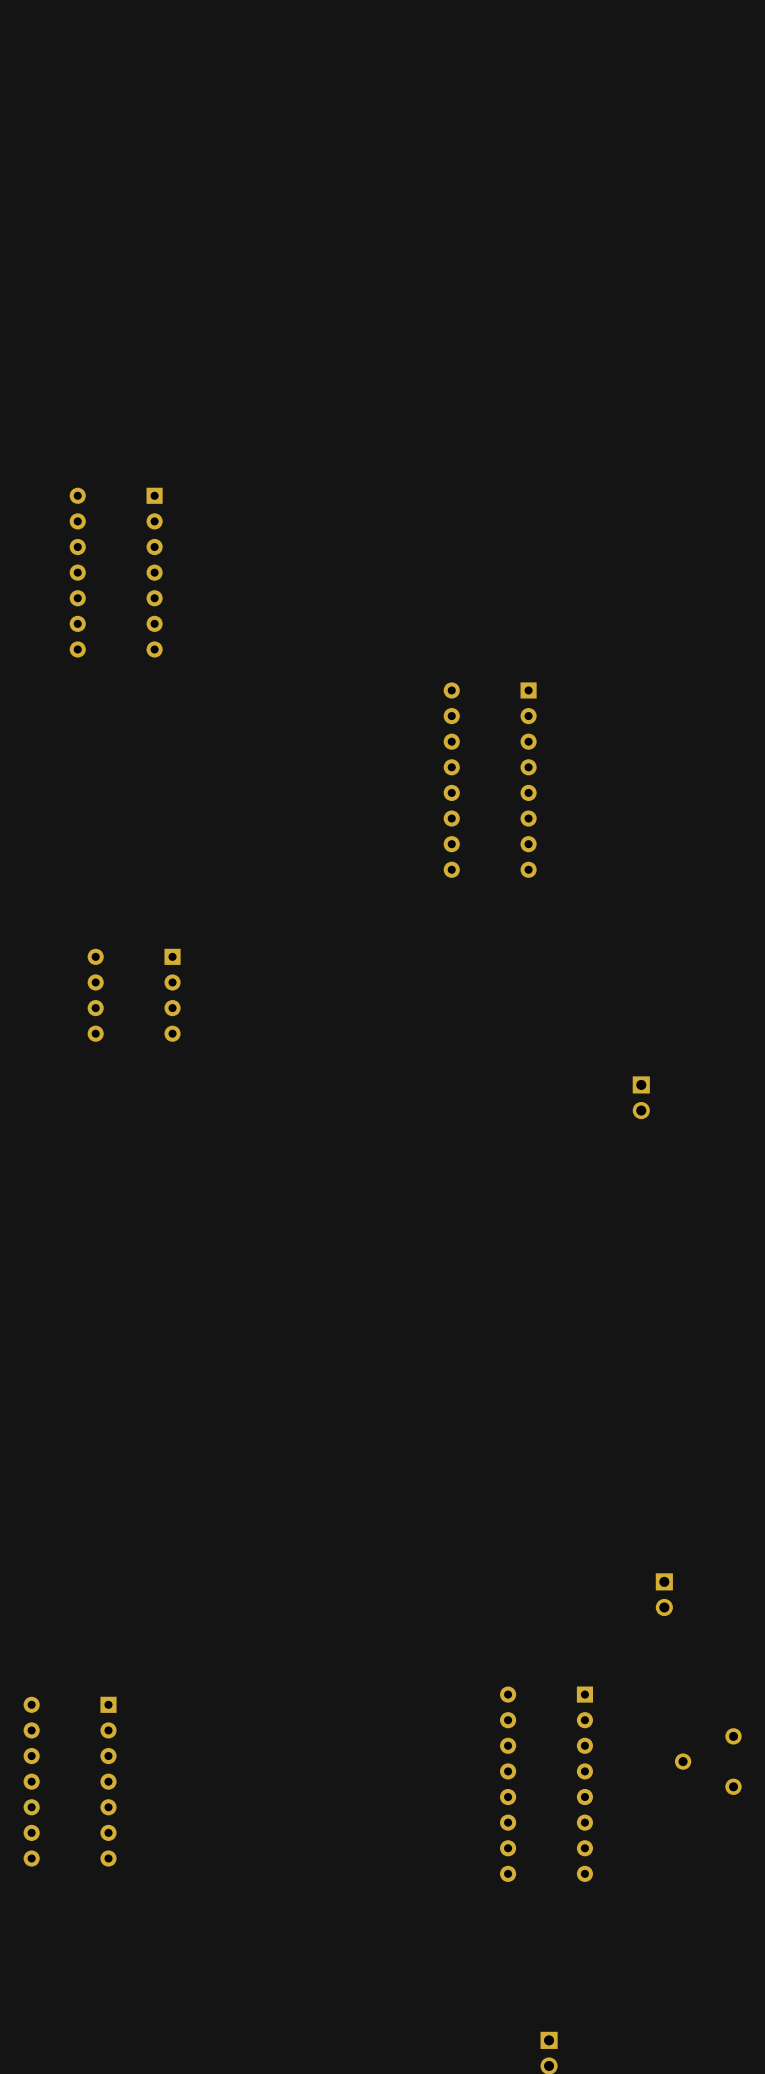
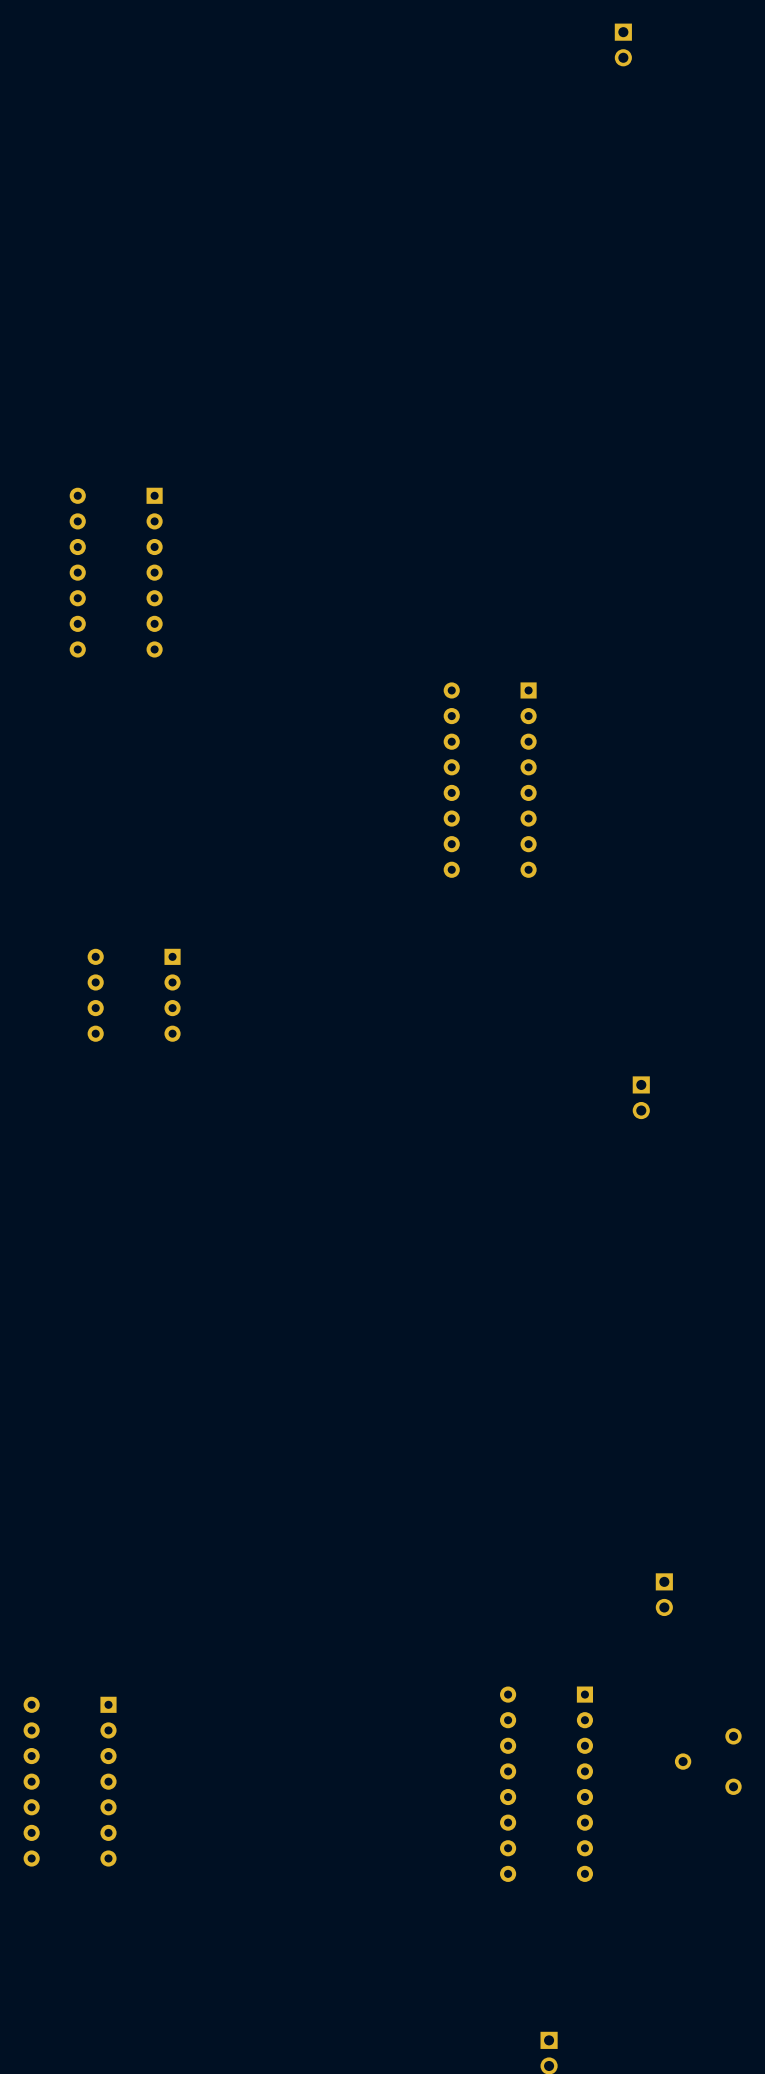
part: none -> (623, 44)

